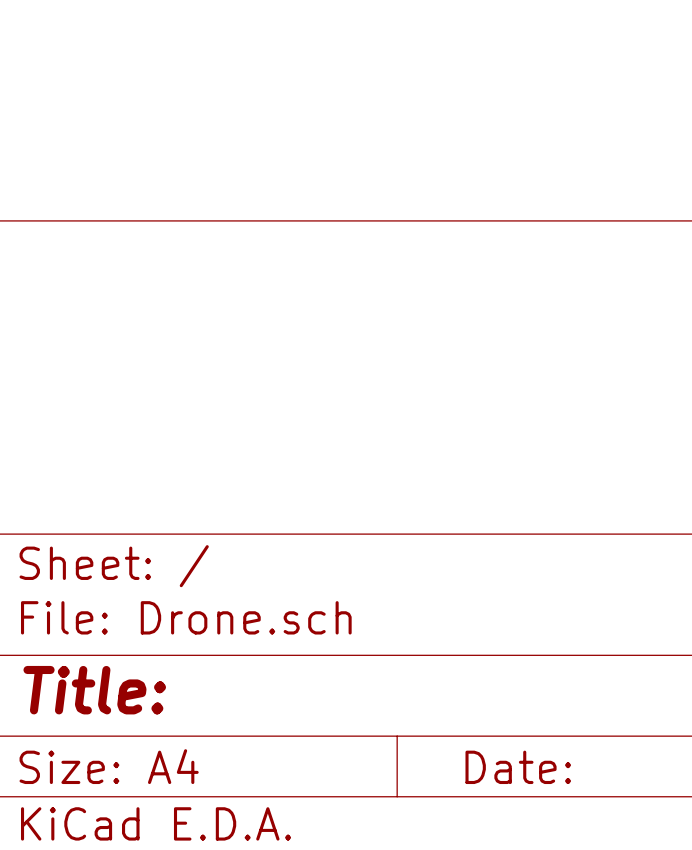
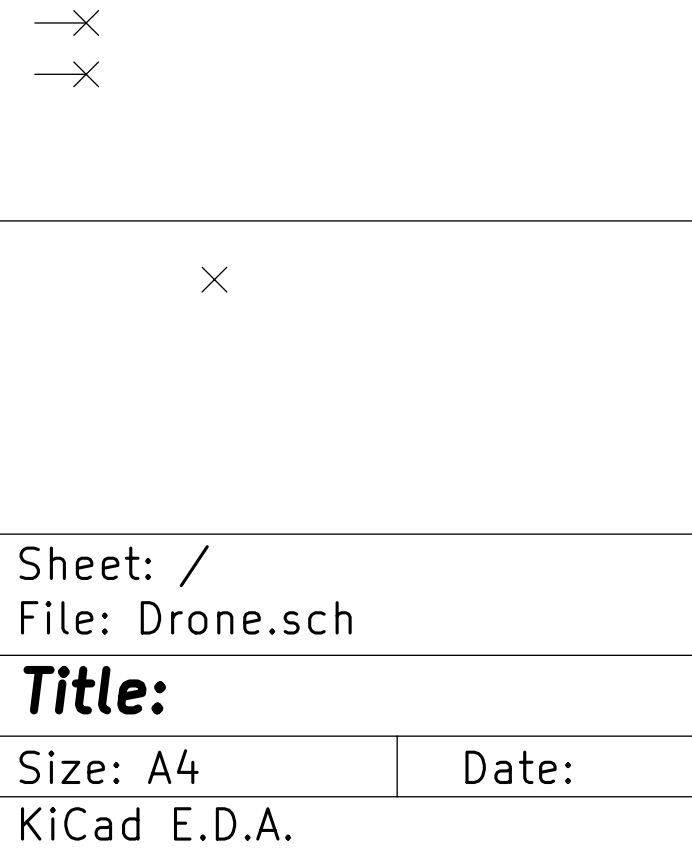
wire: none -> (34, 22) (86, 22)
no-connect mark: none -> (86, 22)
wire: none -> (34, 74) (86, 74)
no-connect mark: none -> (86, 74)
no-connect mark: none -> (214, 279)

